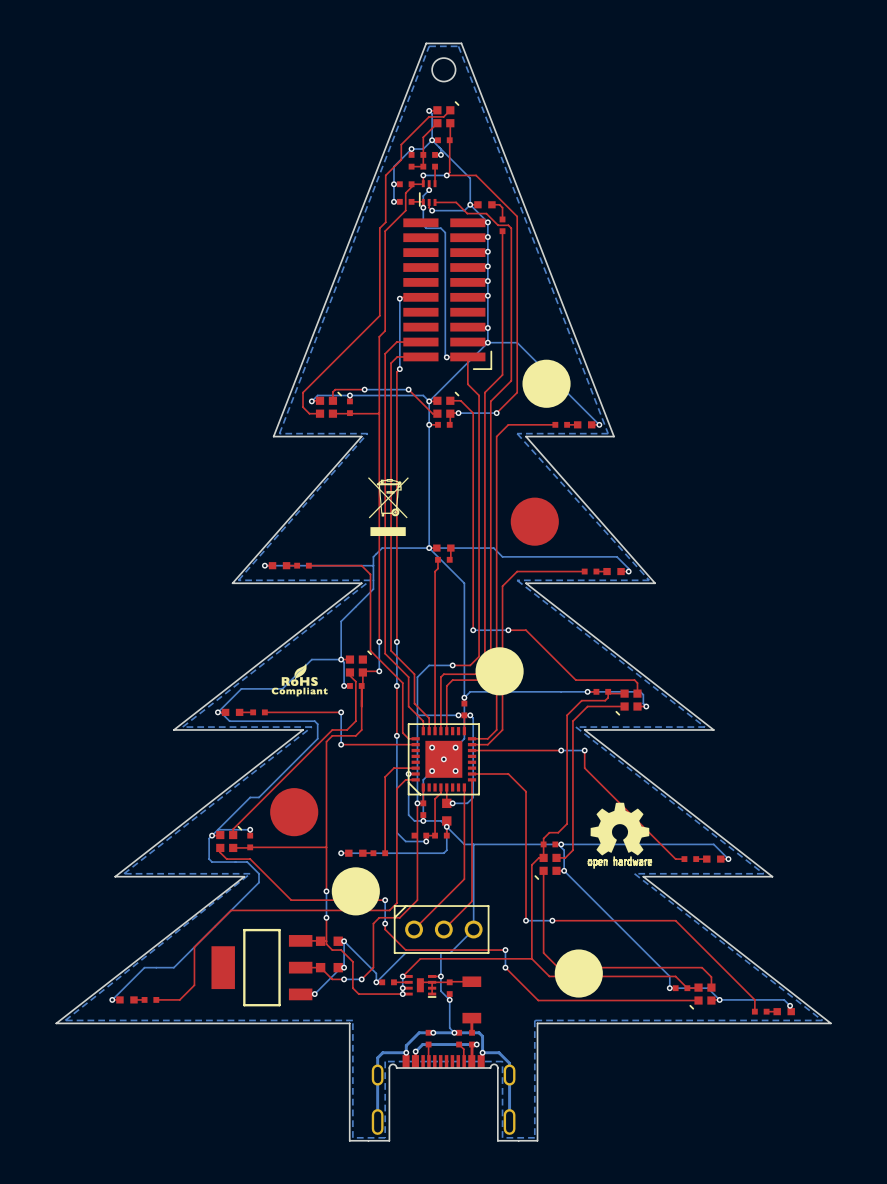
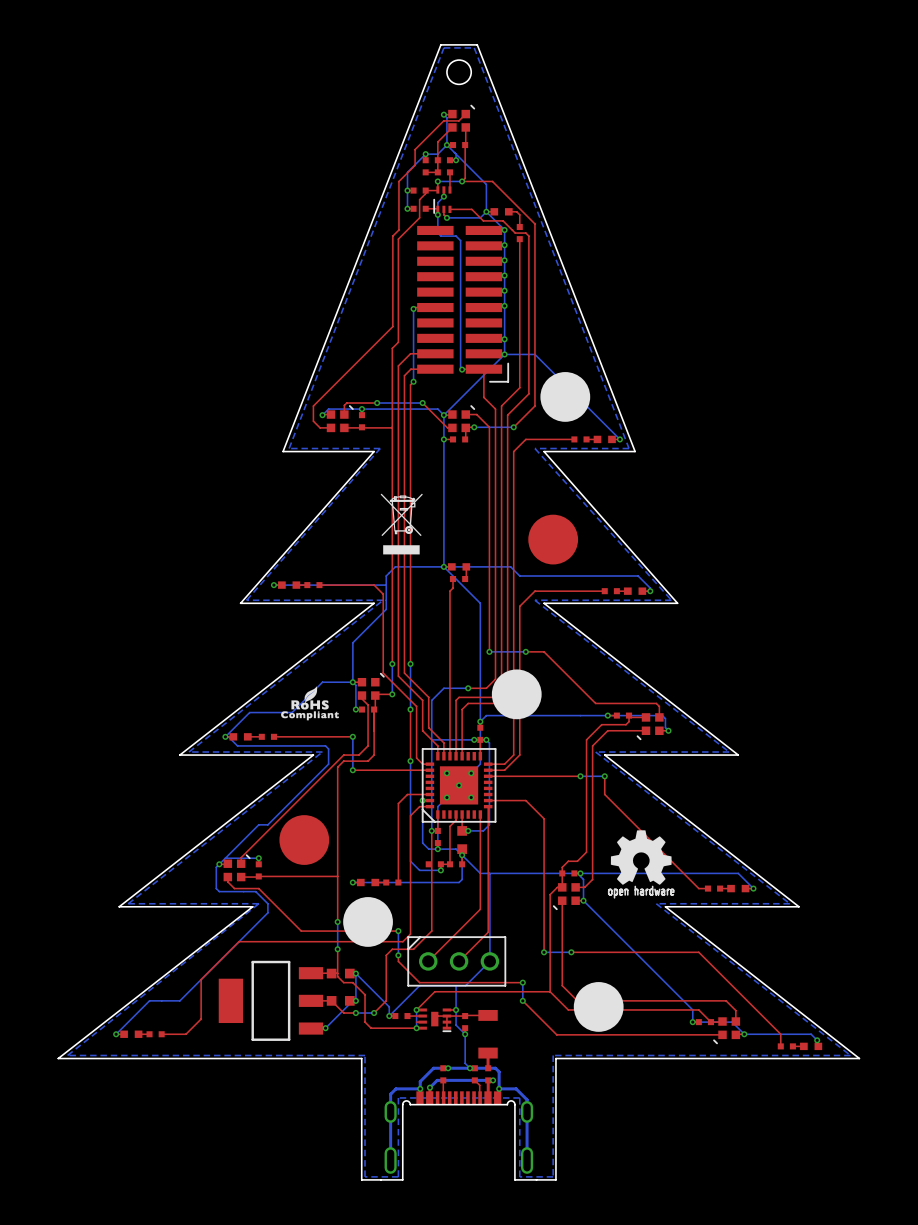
via: (402, 988) -> none

